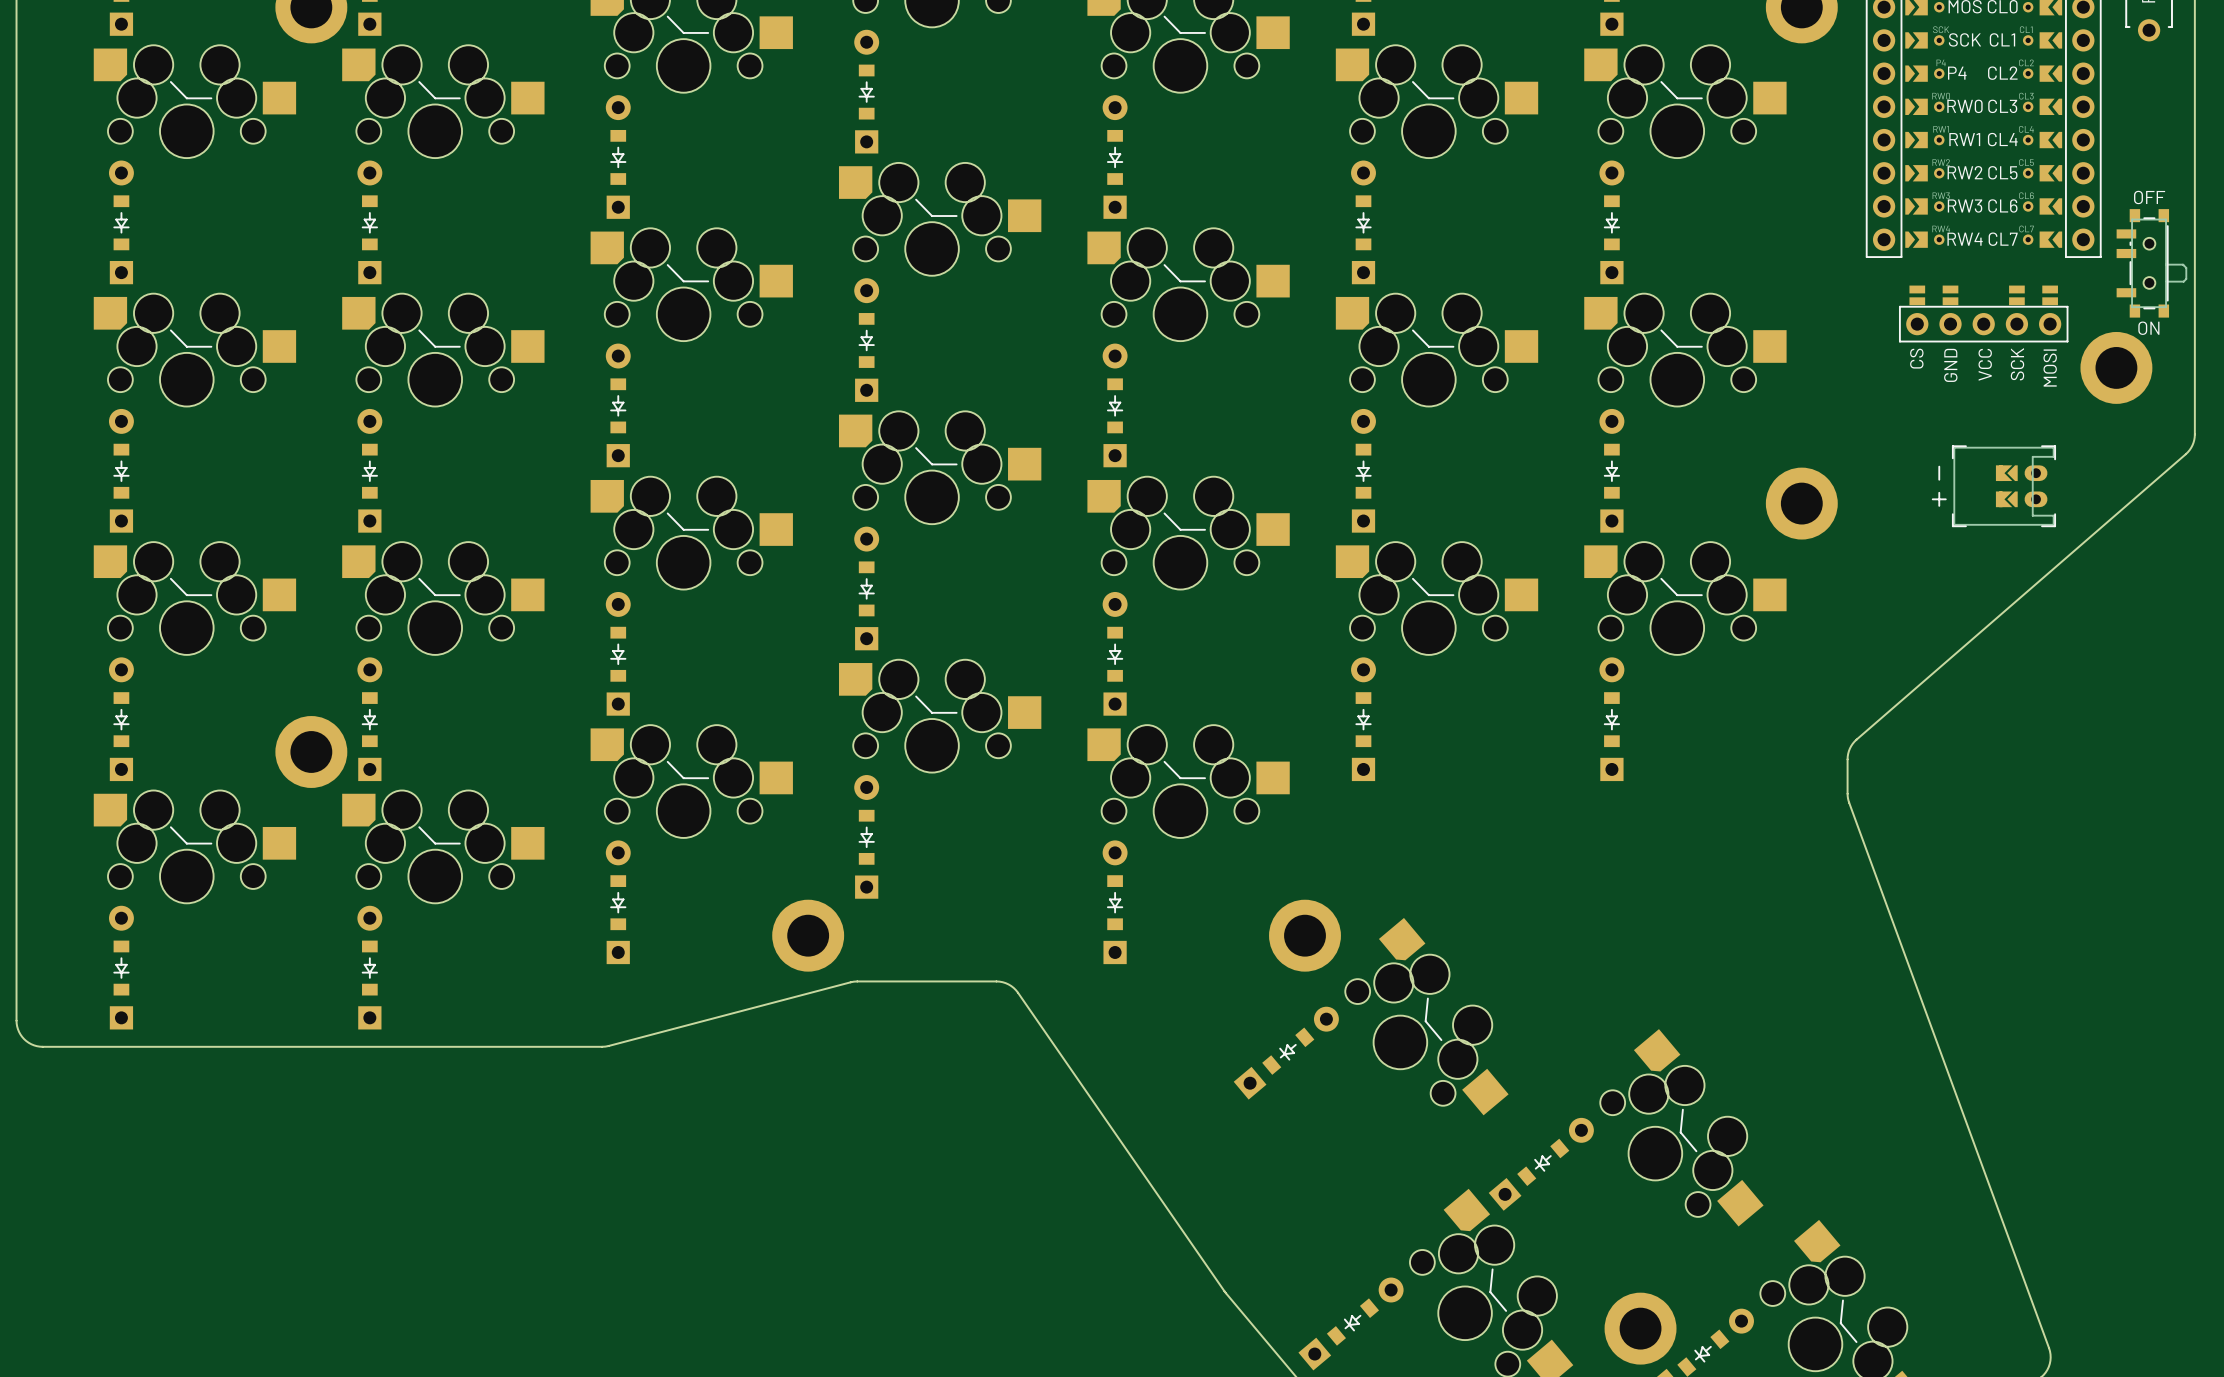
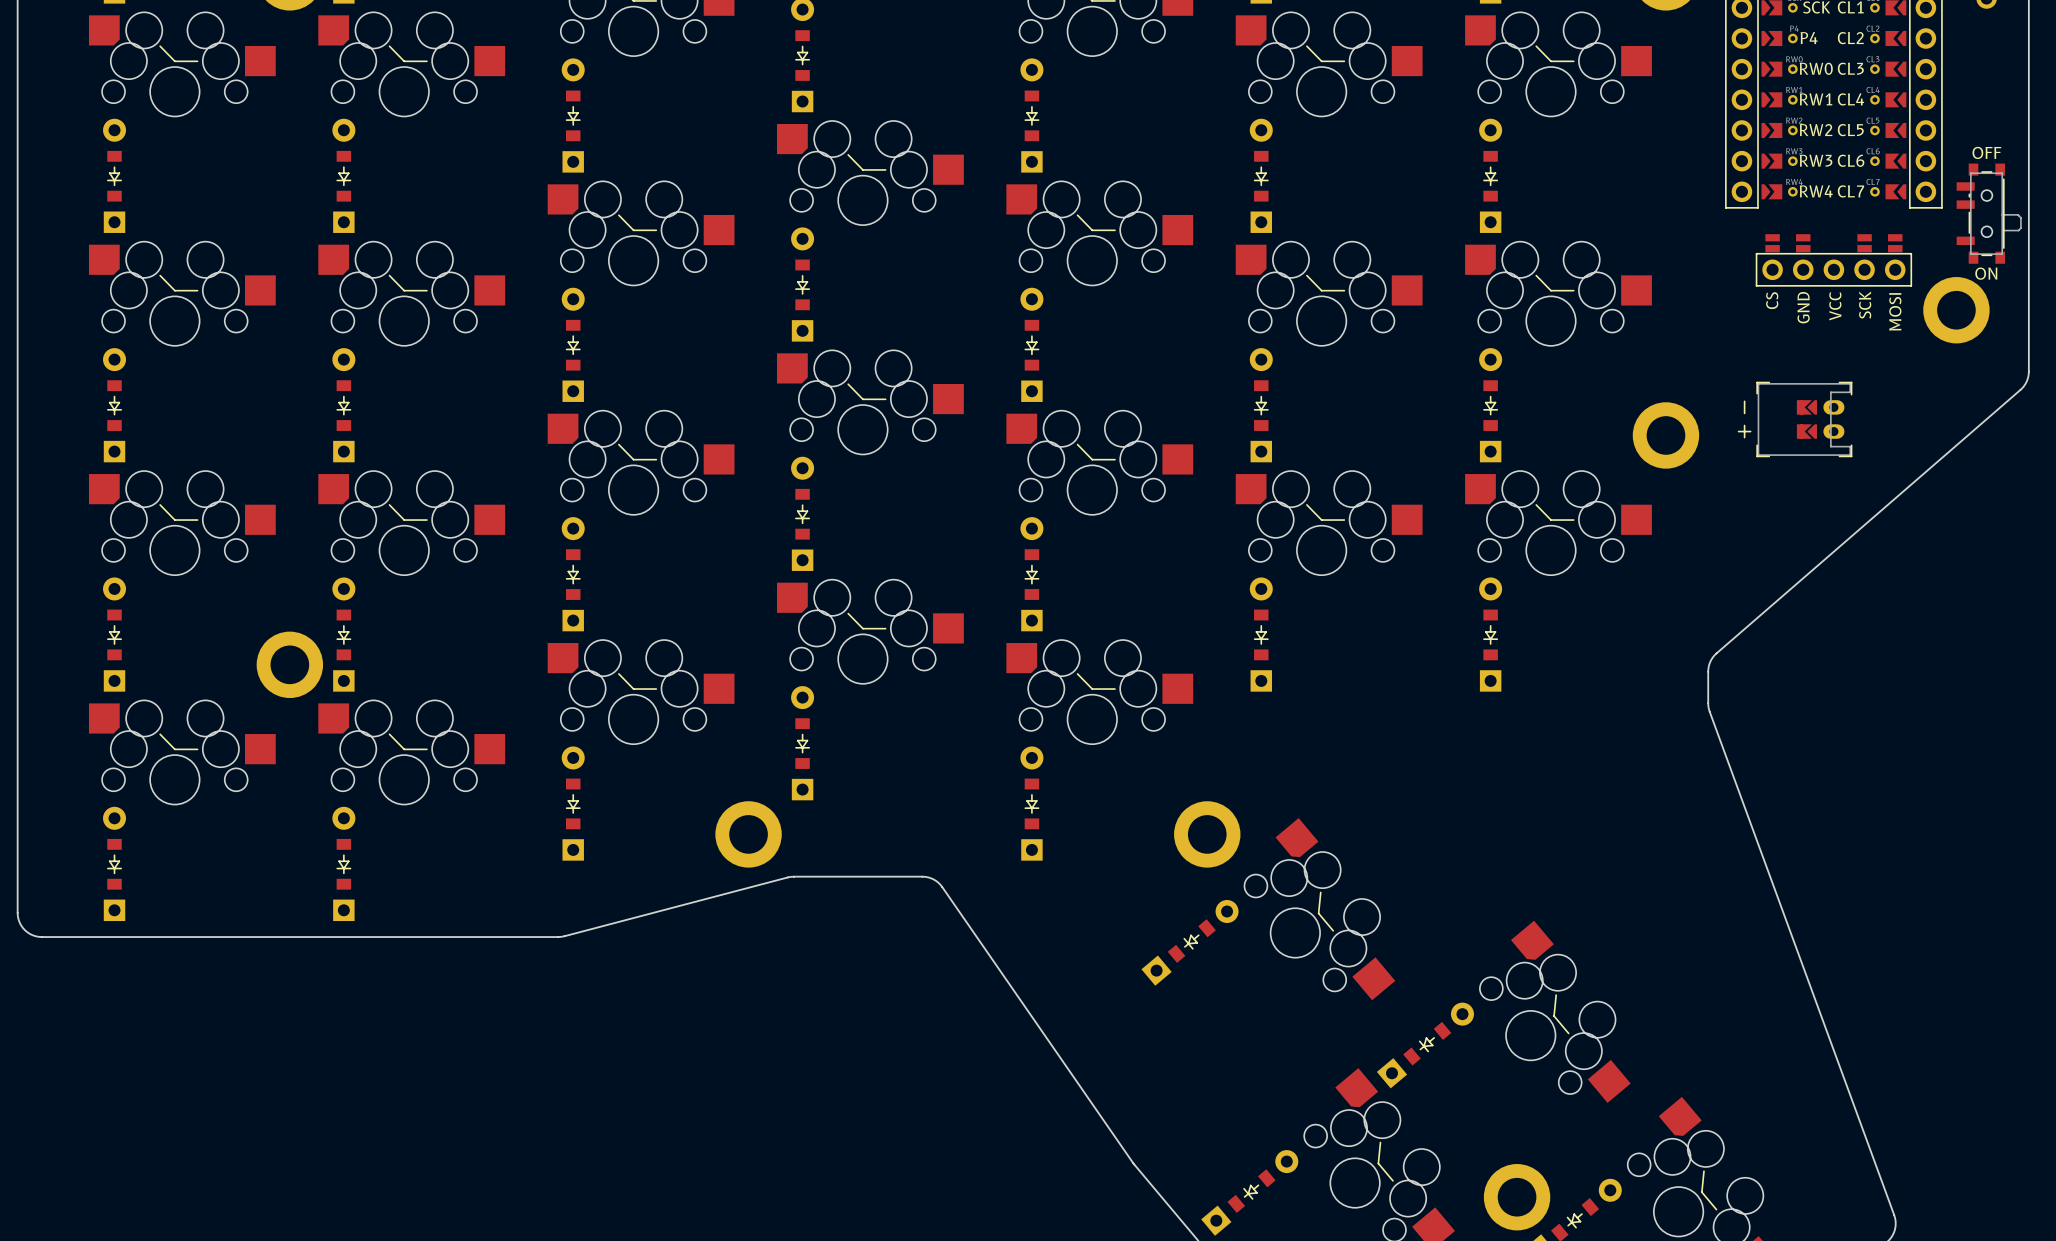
part position: (1993, 486) -> (1795, 419)

